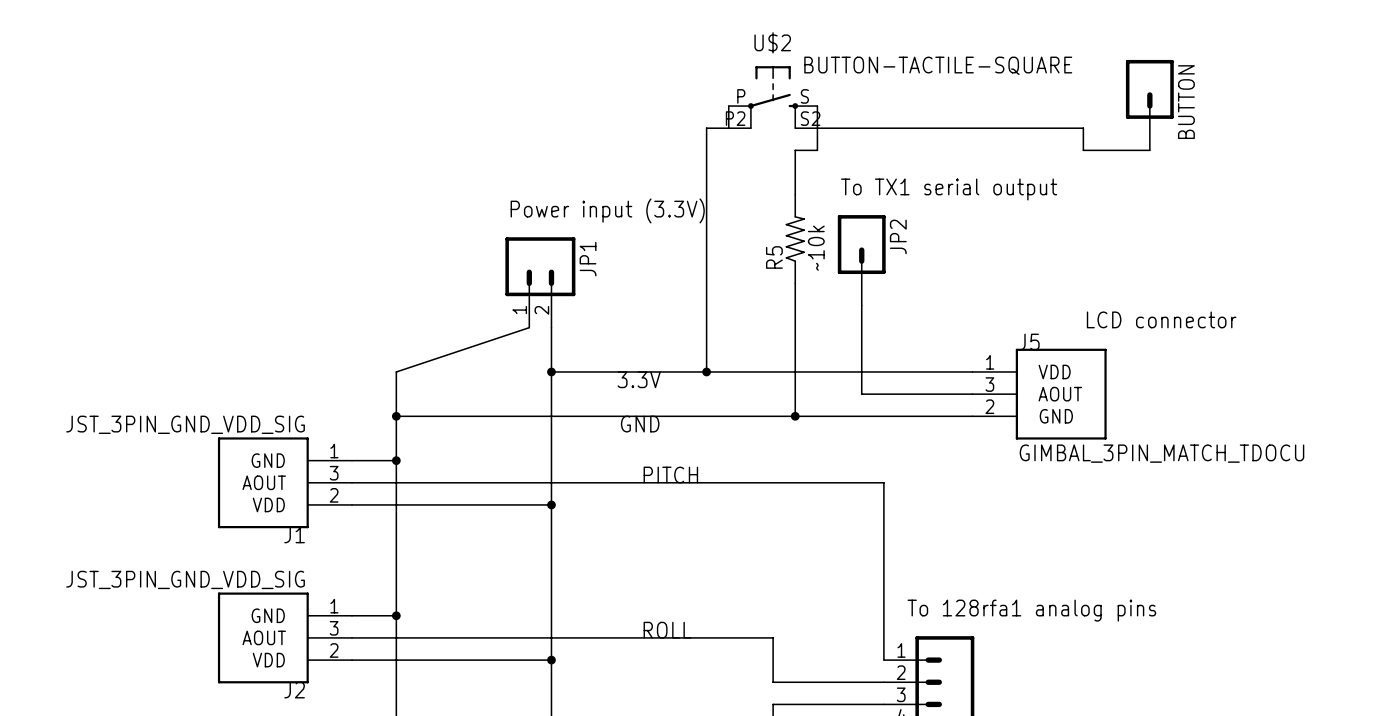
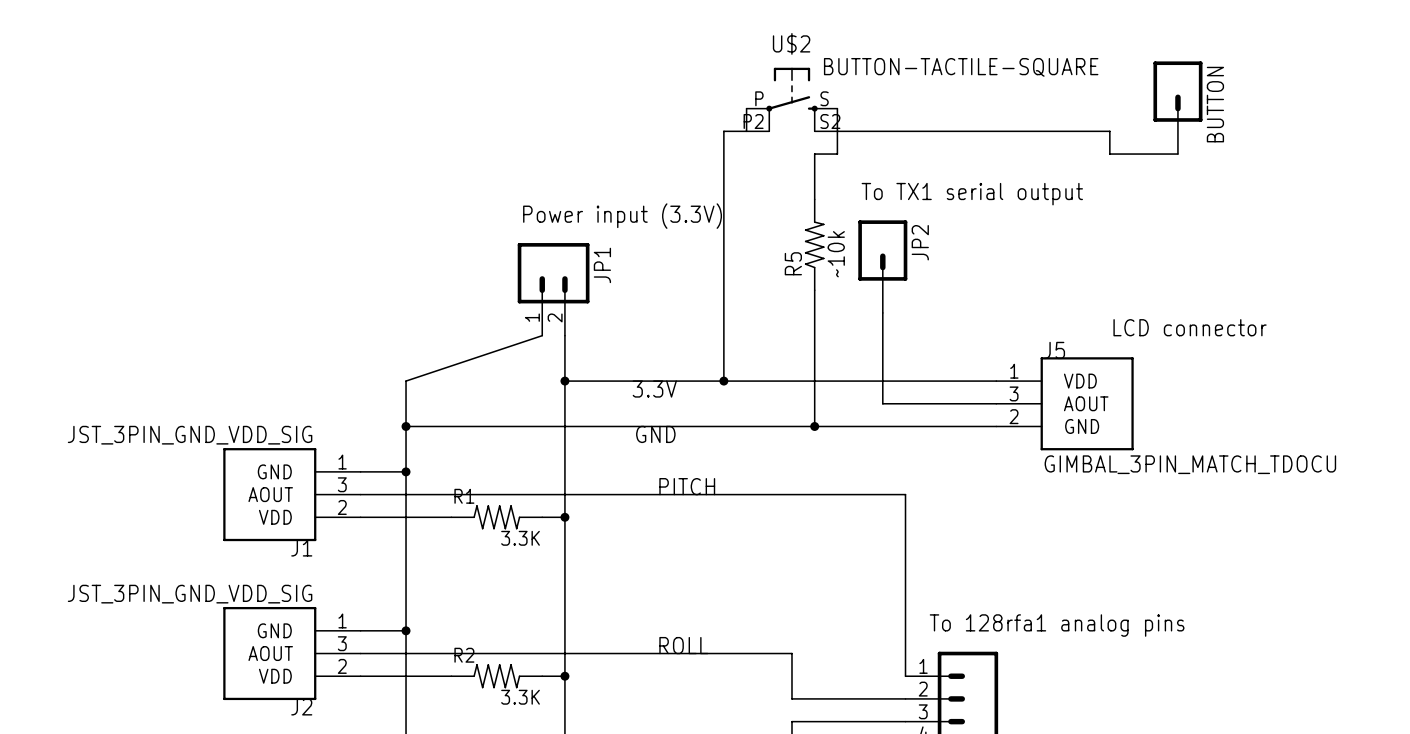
R1: none -> 3.3K (496, 517)
R2: none -> 3.3K (496, 676)

